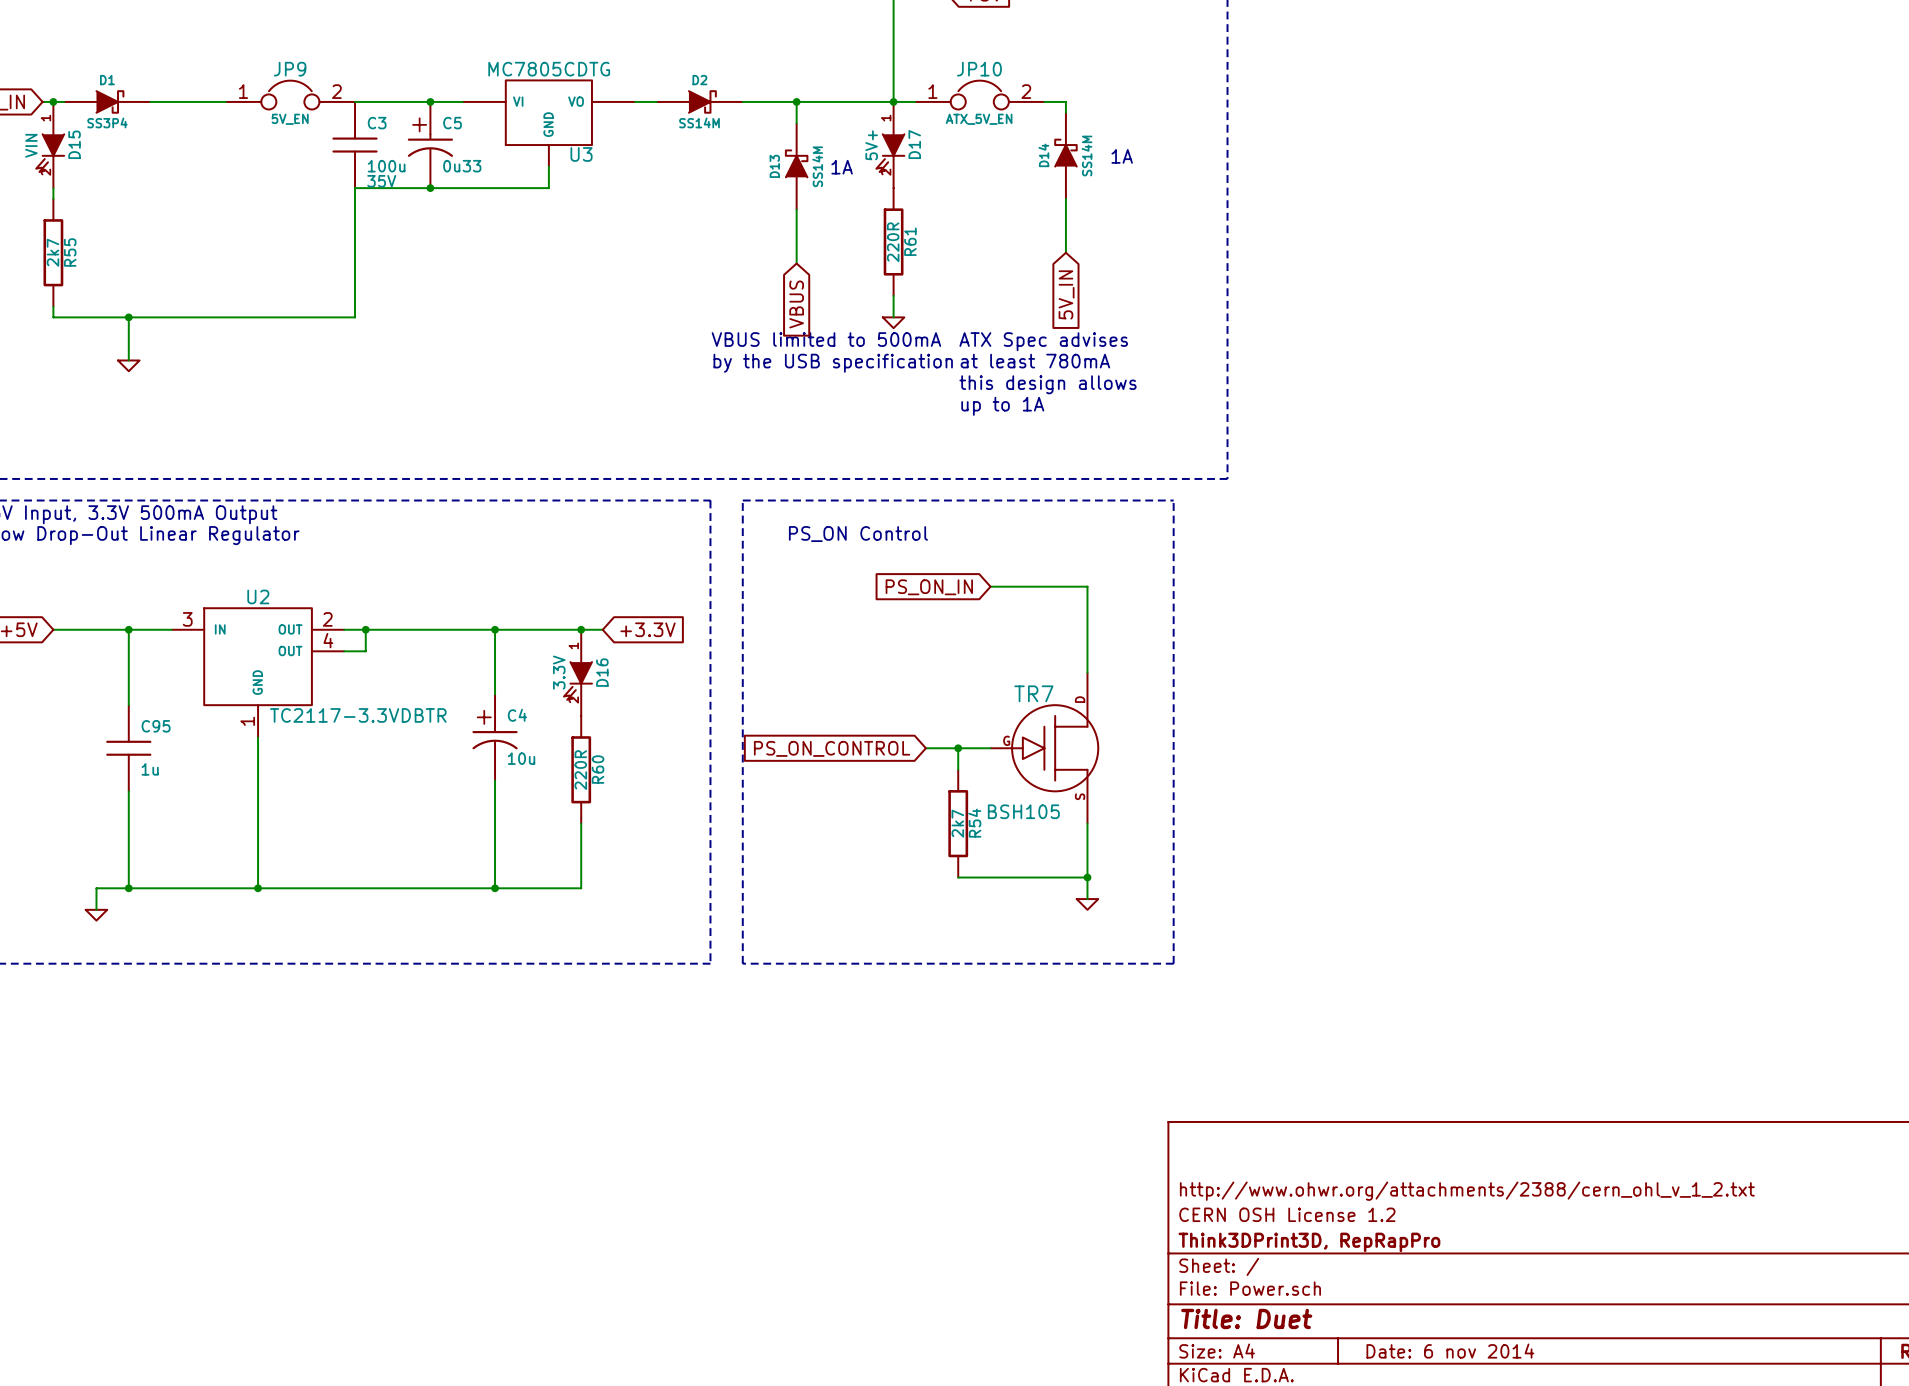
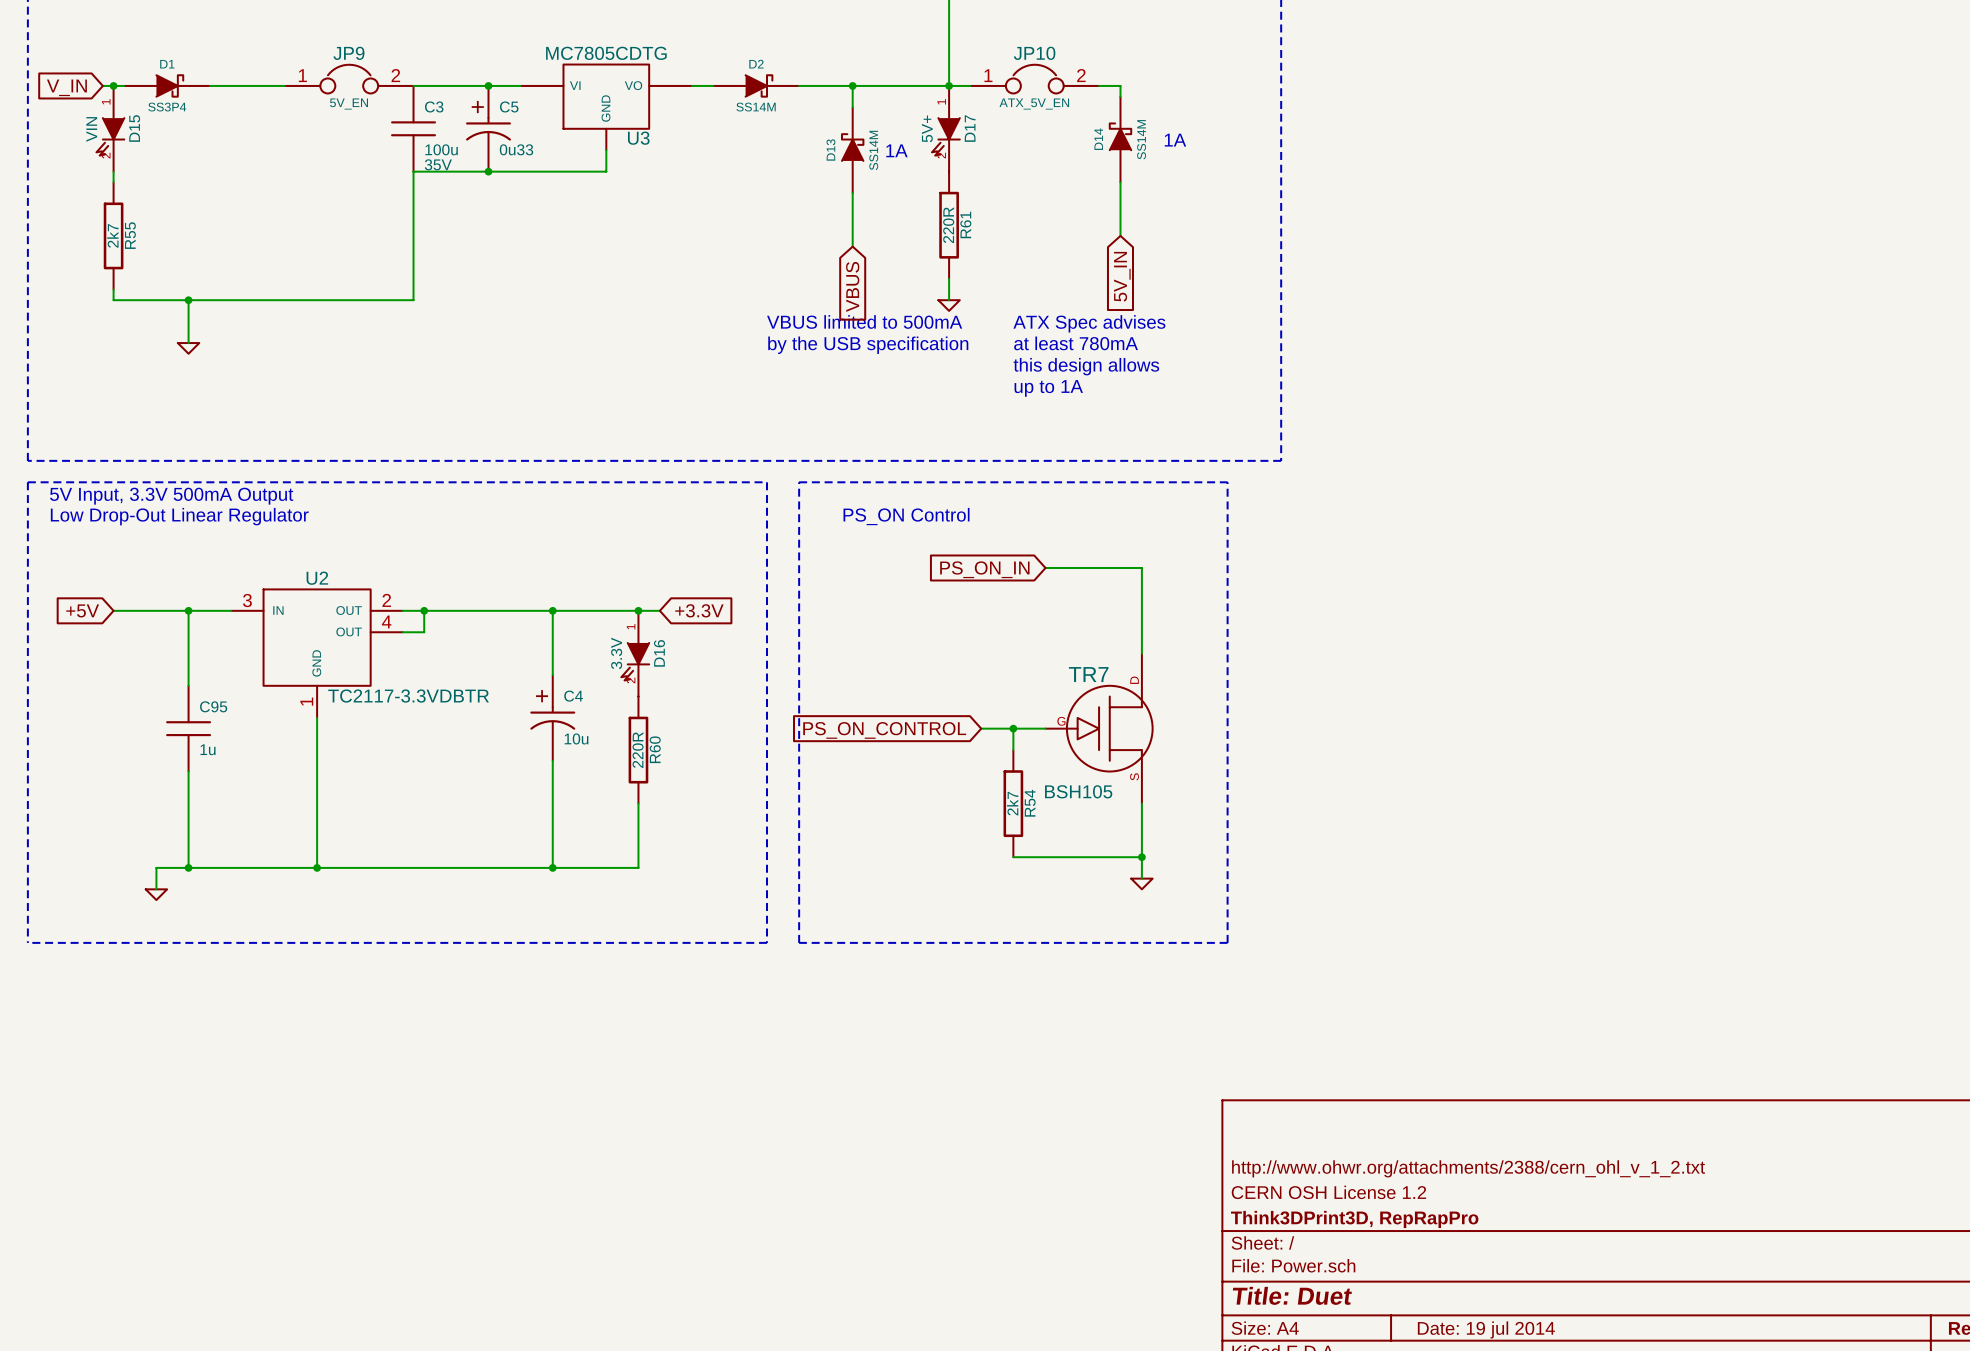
title block: Date: 6 nov 2014 (1450, 1351) -> Date: 19 jul 2014 (1486, 1329)

